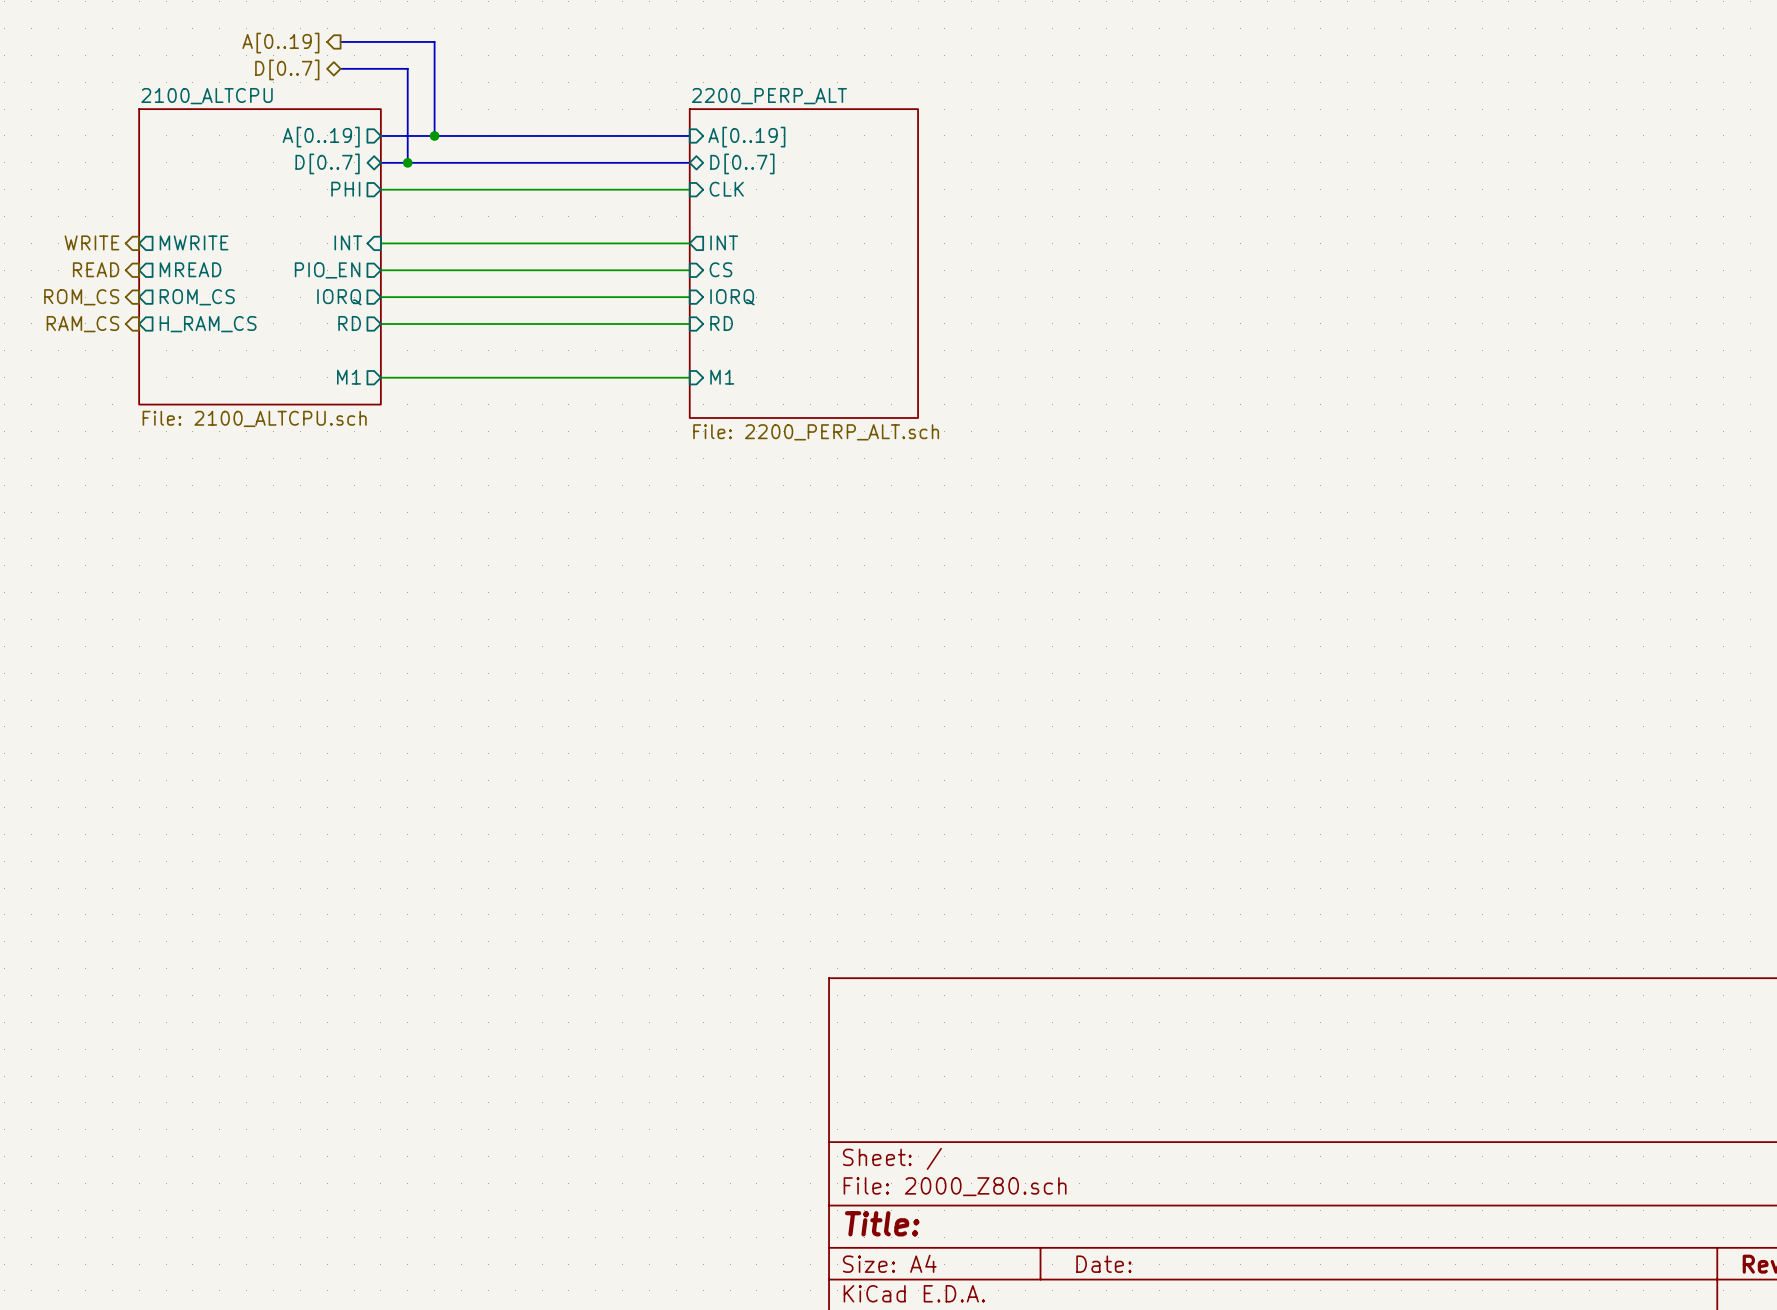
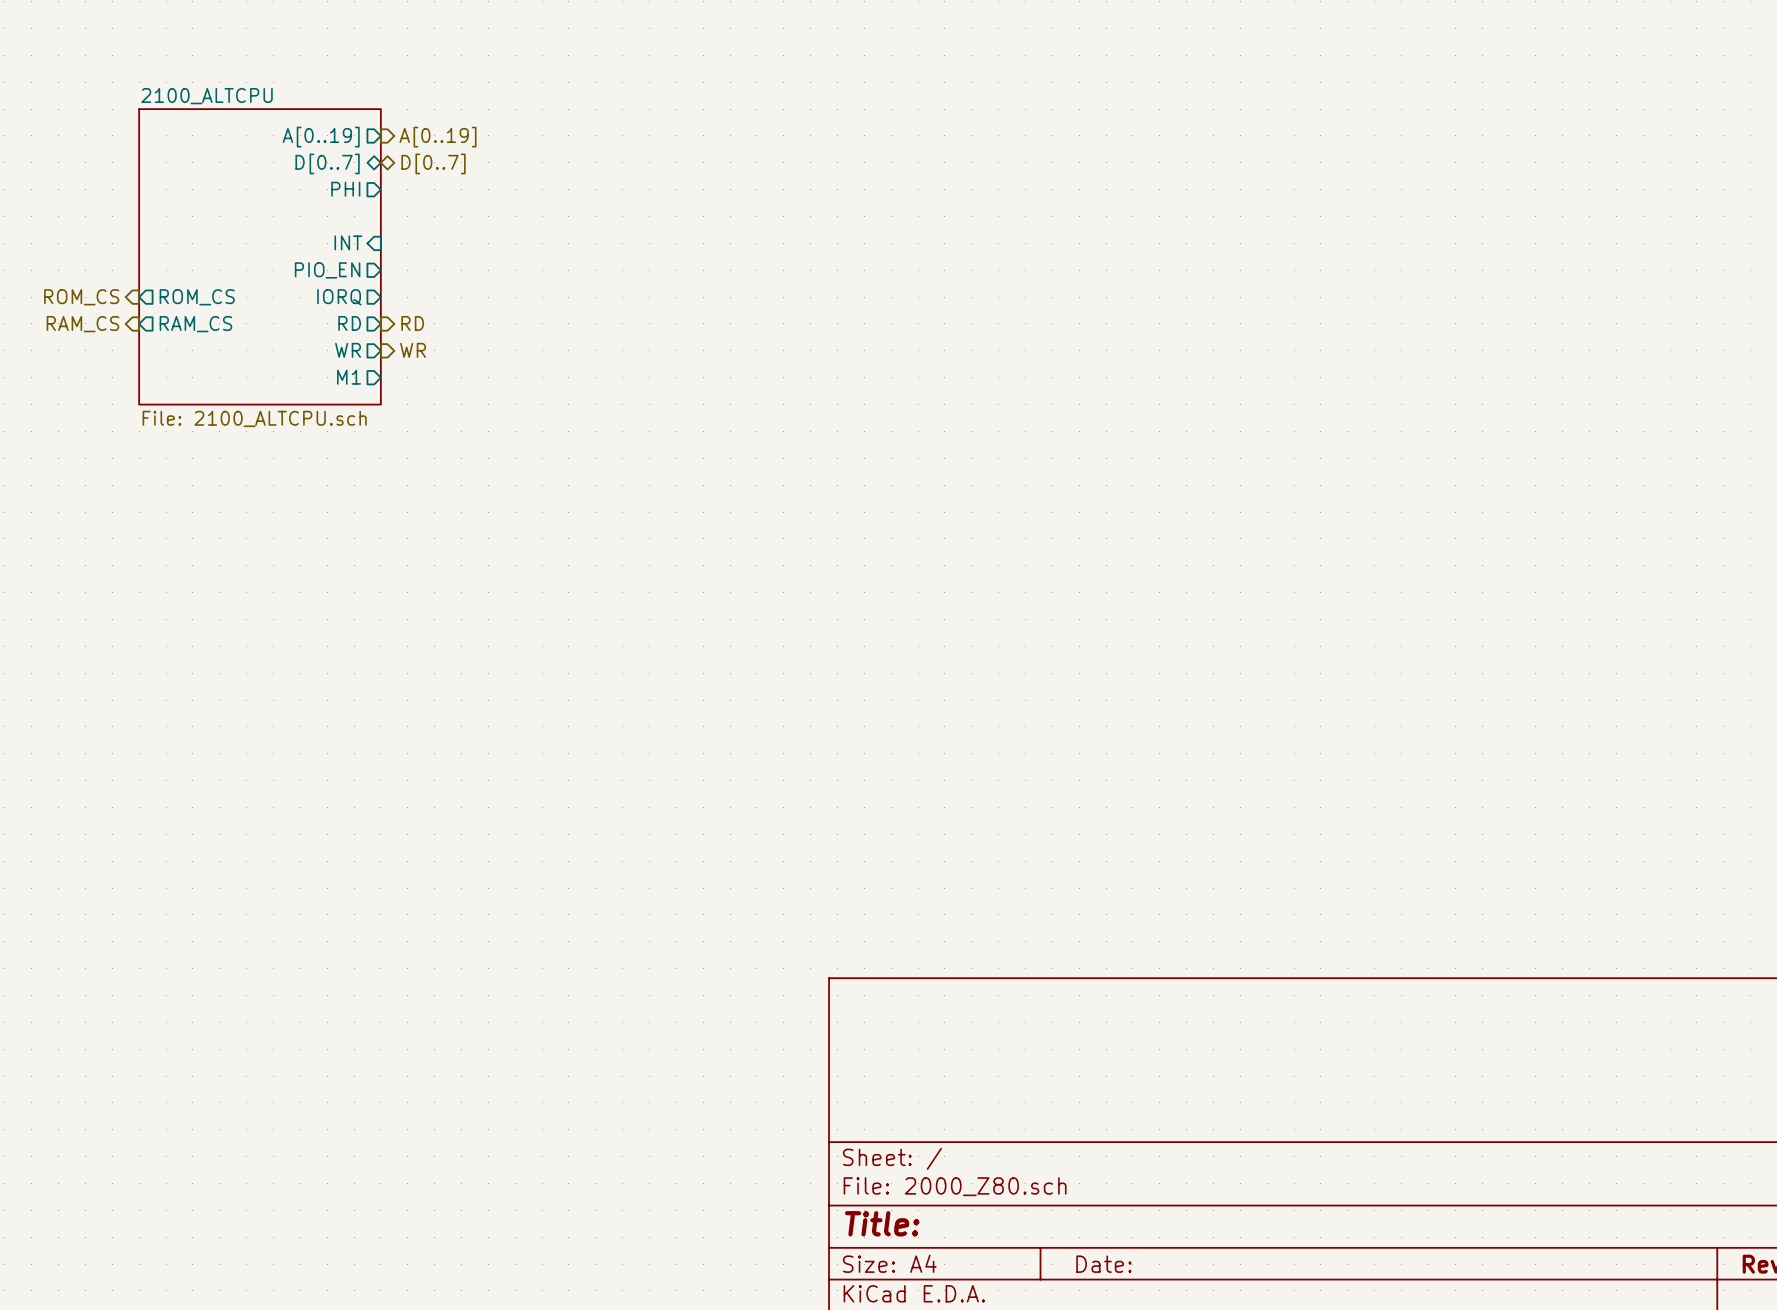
bus: (340, 41) (434, 41) (434, 135) -> none
hierarchical label rotation: 0° (280, 43) -> 180° (437, 137)
hierarchical label position: A[0..19] (280, 43) -> A[0..19] (437, 137)
bus: (340, 68) (407, 68) (407, 162) -> none
hierarchical label rotation: 0° (287, 69) -> 180° (433, 163)
hierarchical label position: D[0..7] (287, 69) -> D[0..7] (433, 163)
bus: (380, 135) (689, 135) -> none
junction: (434, 135) -> none
sheet pin: A[0..19] (746, 137) -> none
bus: (380, 162) (689, 162) -> none
junction: (407, 162) -> none
sheet pin: D[0..7] (742, 163) -> none
wire: (380, 189) (689, 189) -> none
sheet pin: CLK (726, 189) -> none
hierarchical label: WRITE (91, 242) -> none
sheet pin: MWRITE (194, 242) -> none
sheet pin: INT (724, 242) -> none
wire: (380, 243) (689, 243) -> none
sheet 2200_PERP_ALT: File: 2200_PERP_ALT.sch (803, 263) -> none
hierarchical label: READ (96, 269) -> none
sheet pin: MREAD (190, 269) -> none
sheet pin: CS (720, 269) -> none
wire: (380, 270) (689, 270) -> none
wire: (380, 297) (689, 297) -> none
sheet pin: IORQ (732, 297) -> none
wire: (380, 323) (689, 323) -> none
hierarchical label: none -> RD (412, 323)
sheet pin: RD (721, 323) -> none
sheet pin: H_RAM_CS (208, 324) -> RAM_CS (195, 324)
sheet pin: none -> WR (348, 350)
hierarchical label: none -> WR (413, 350)
wire: (380, 377) (689, 377) -> none
sheet pin: M1 (722, 377) -> none

